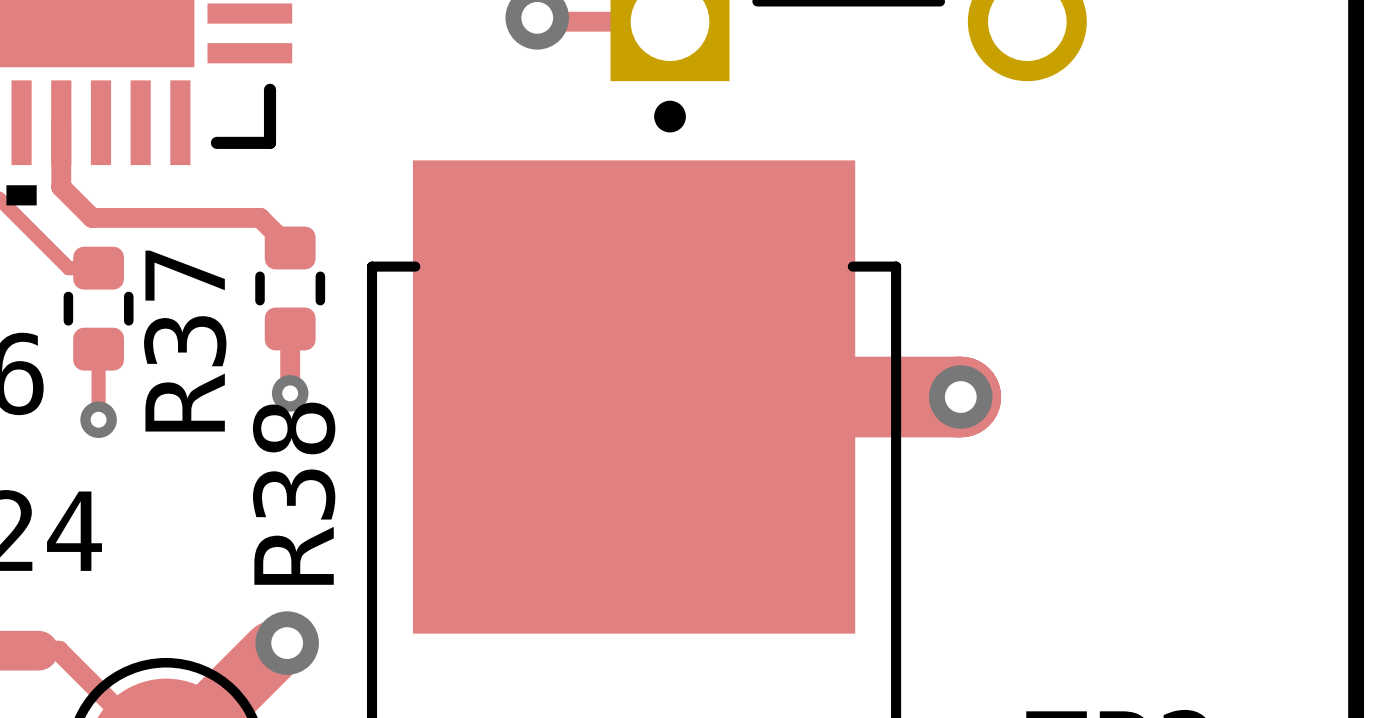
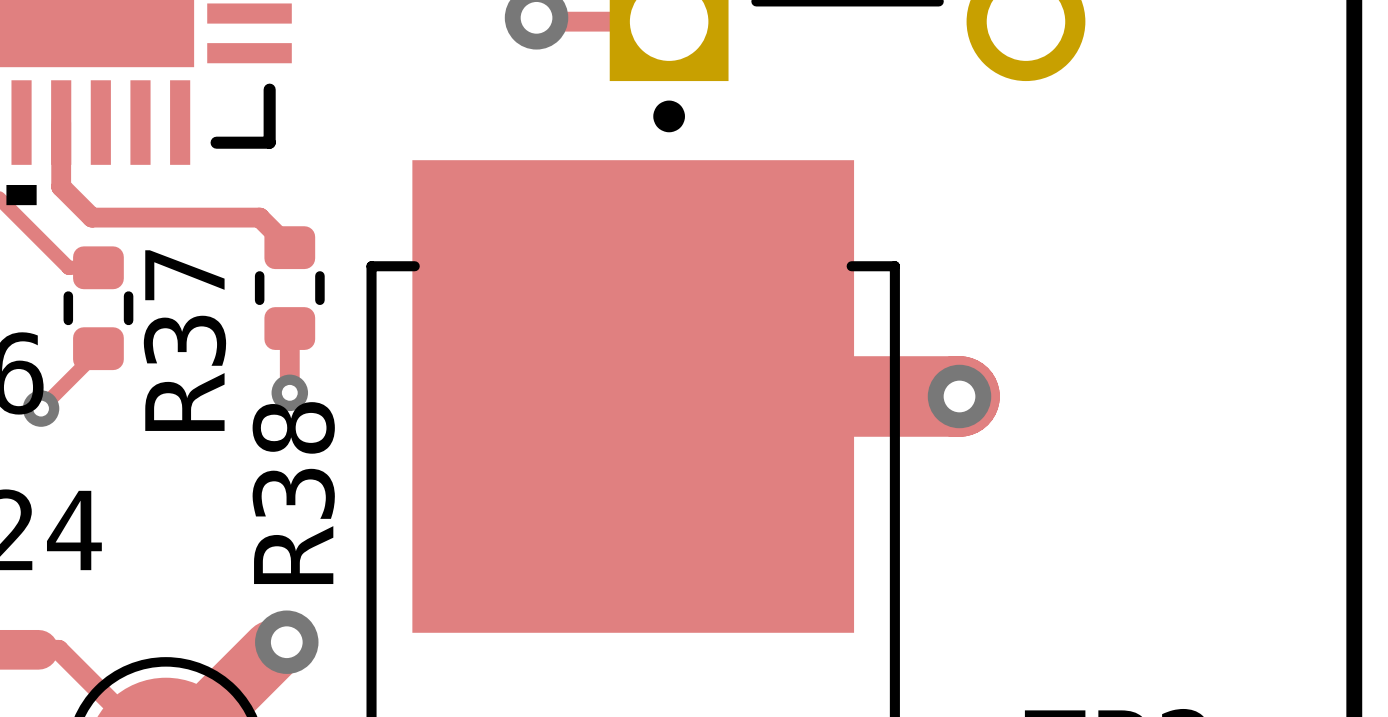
track: (98, 351) (98, 419) -> (98, 351) (41, 408)
via position: (98, 419) -> (41, 408)

